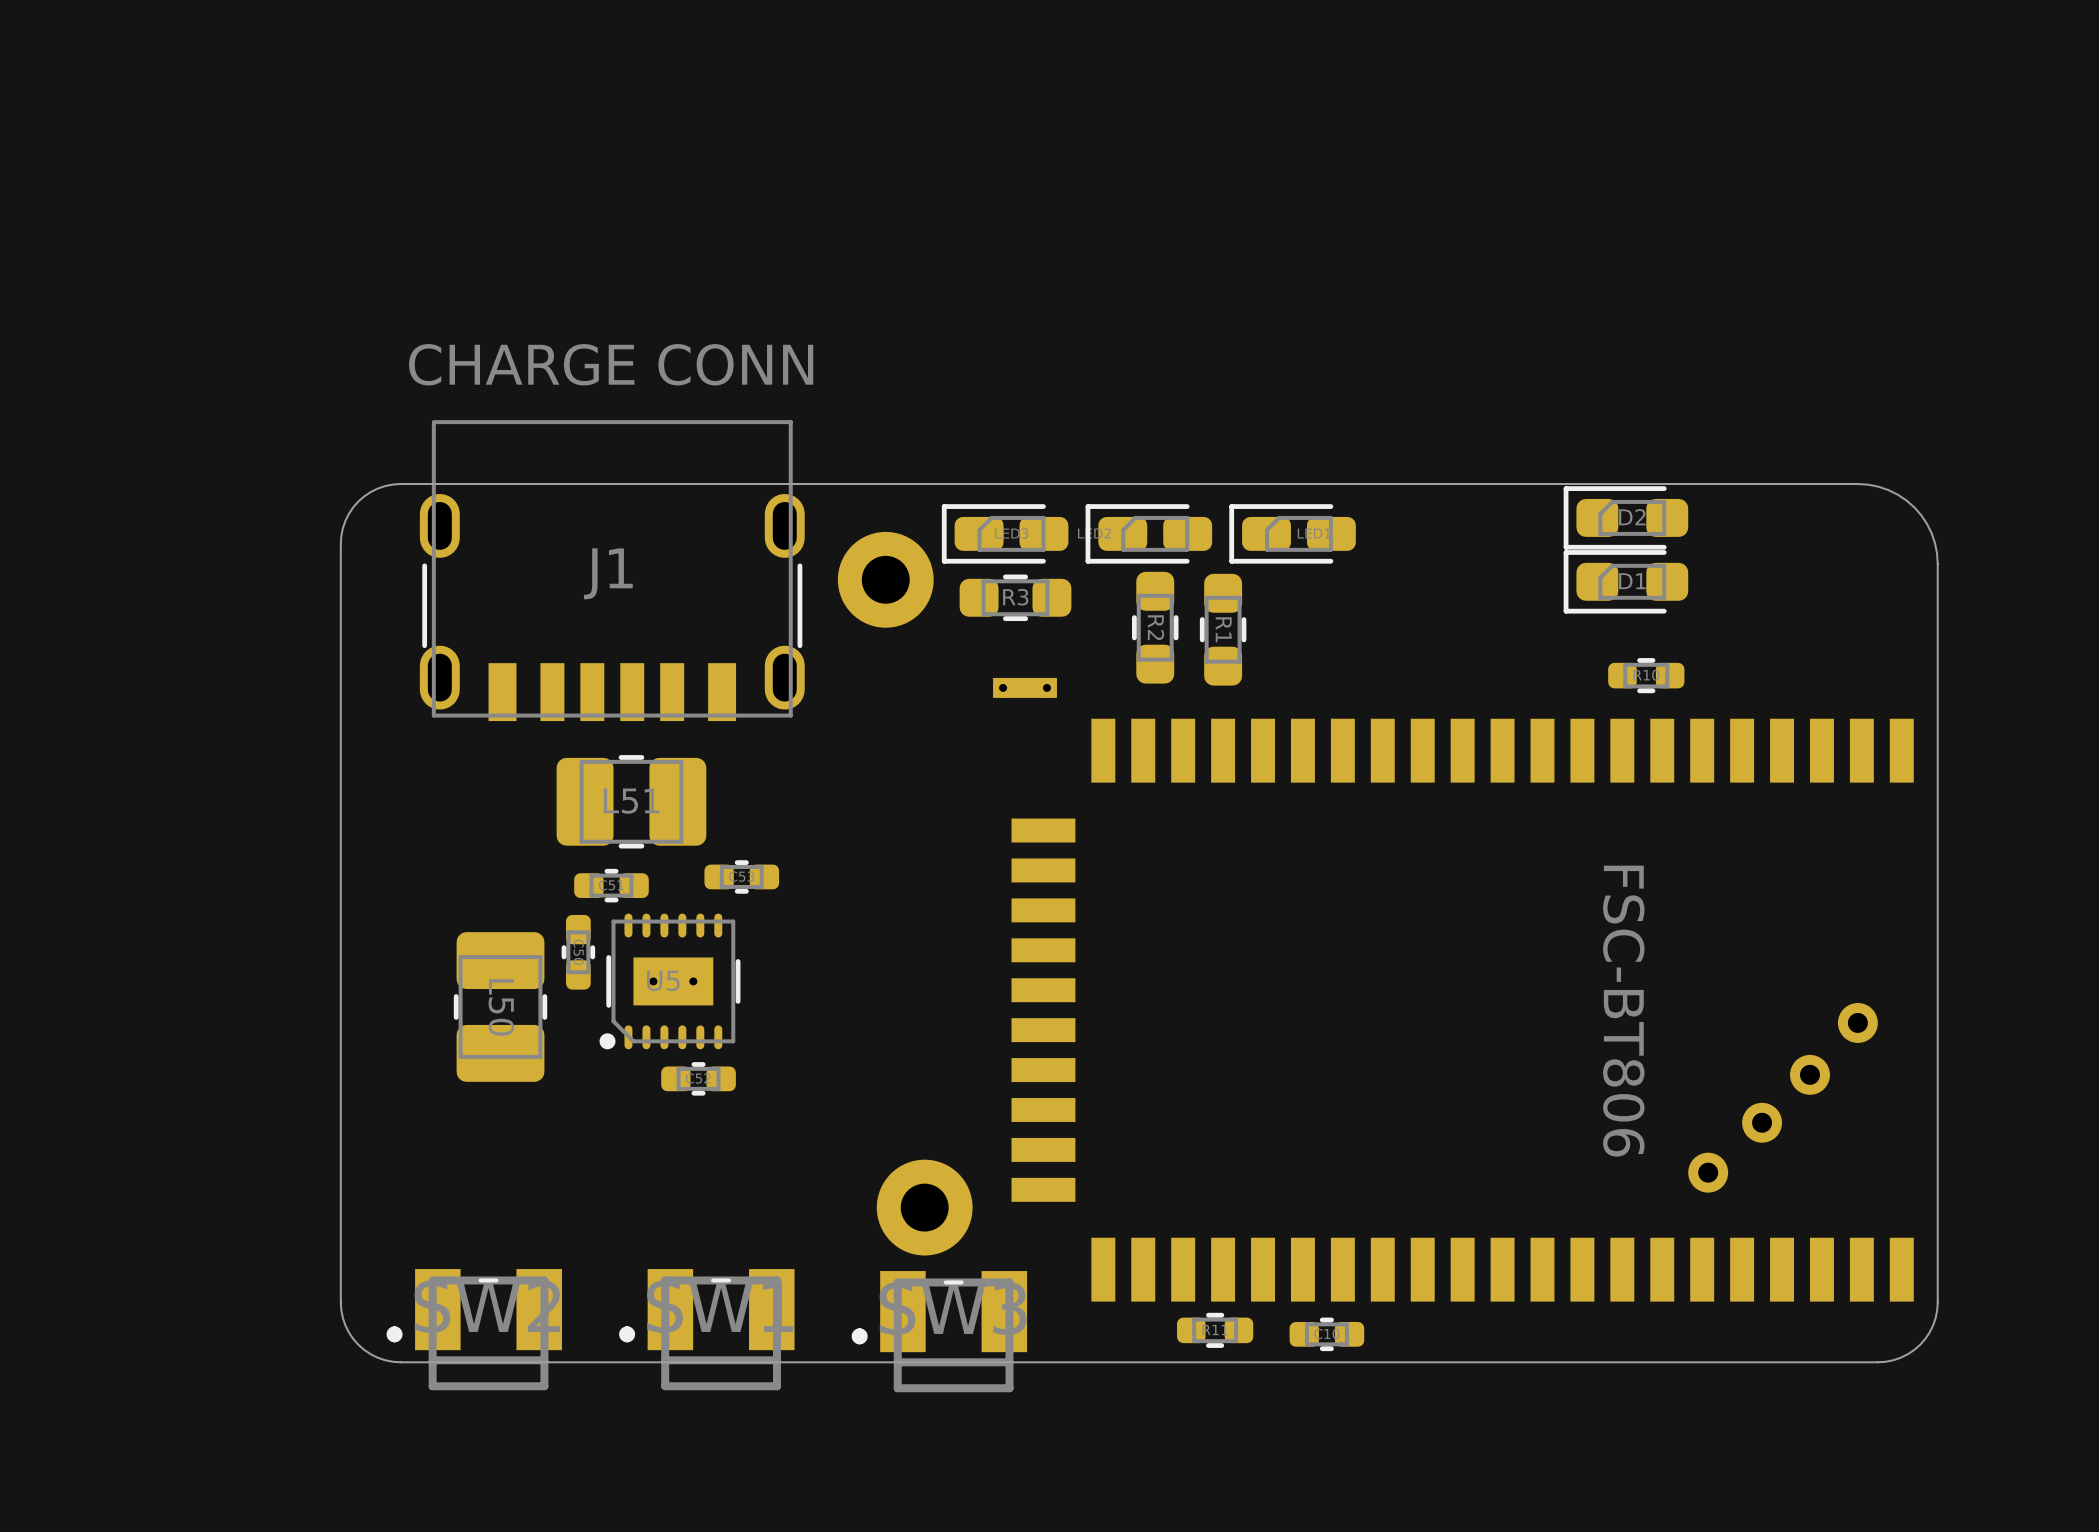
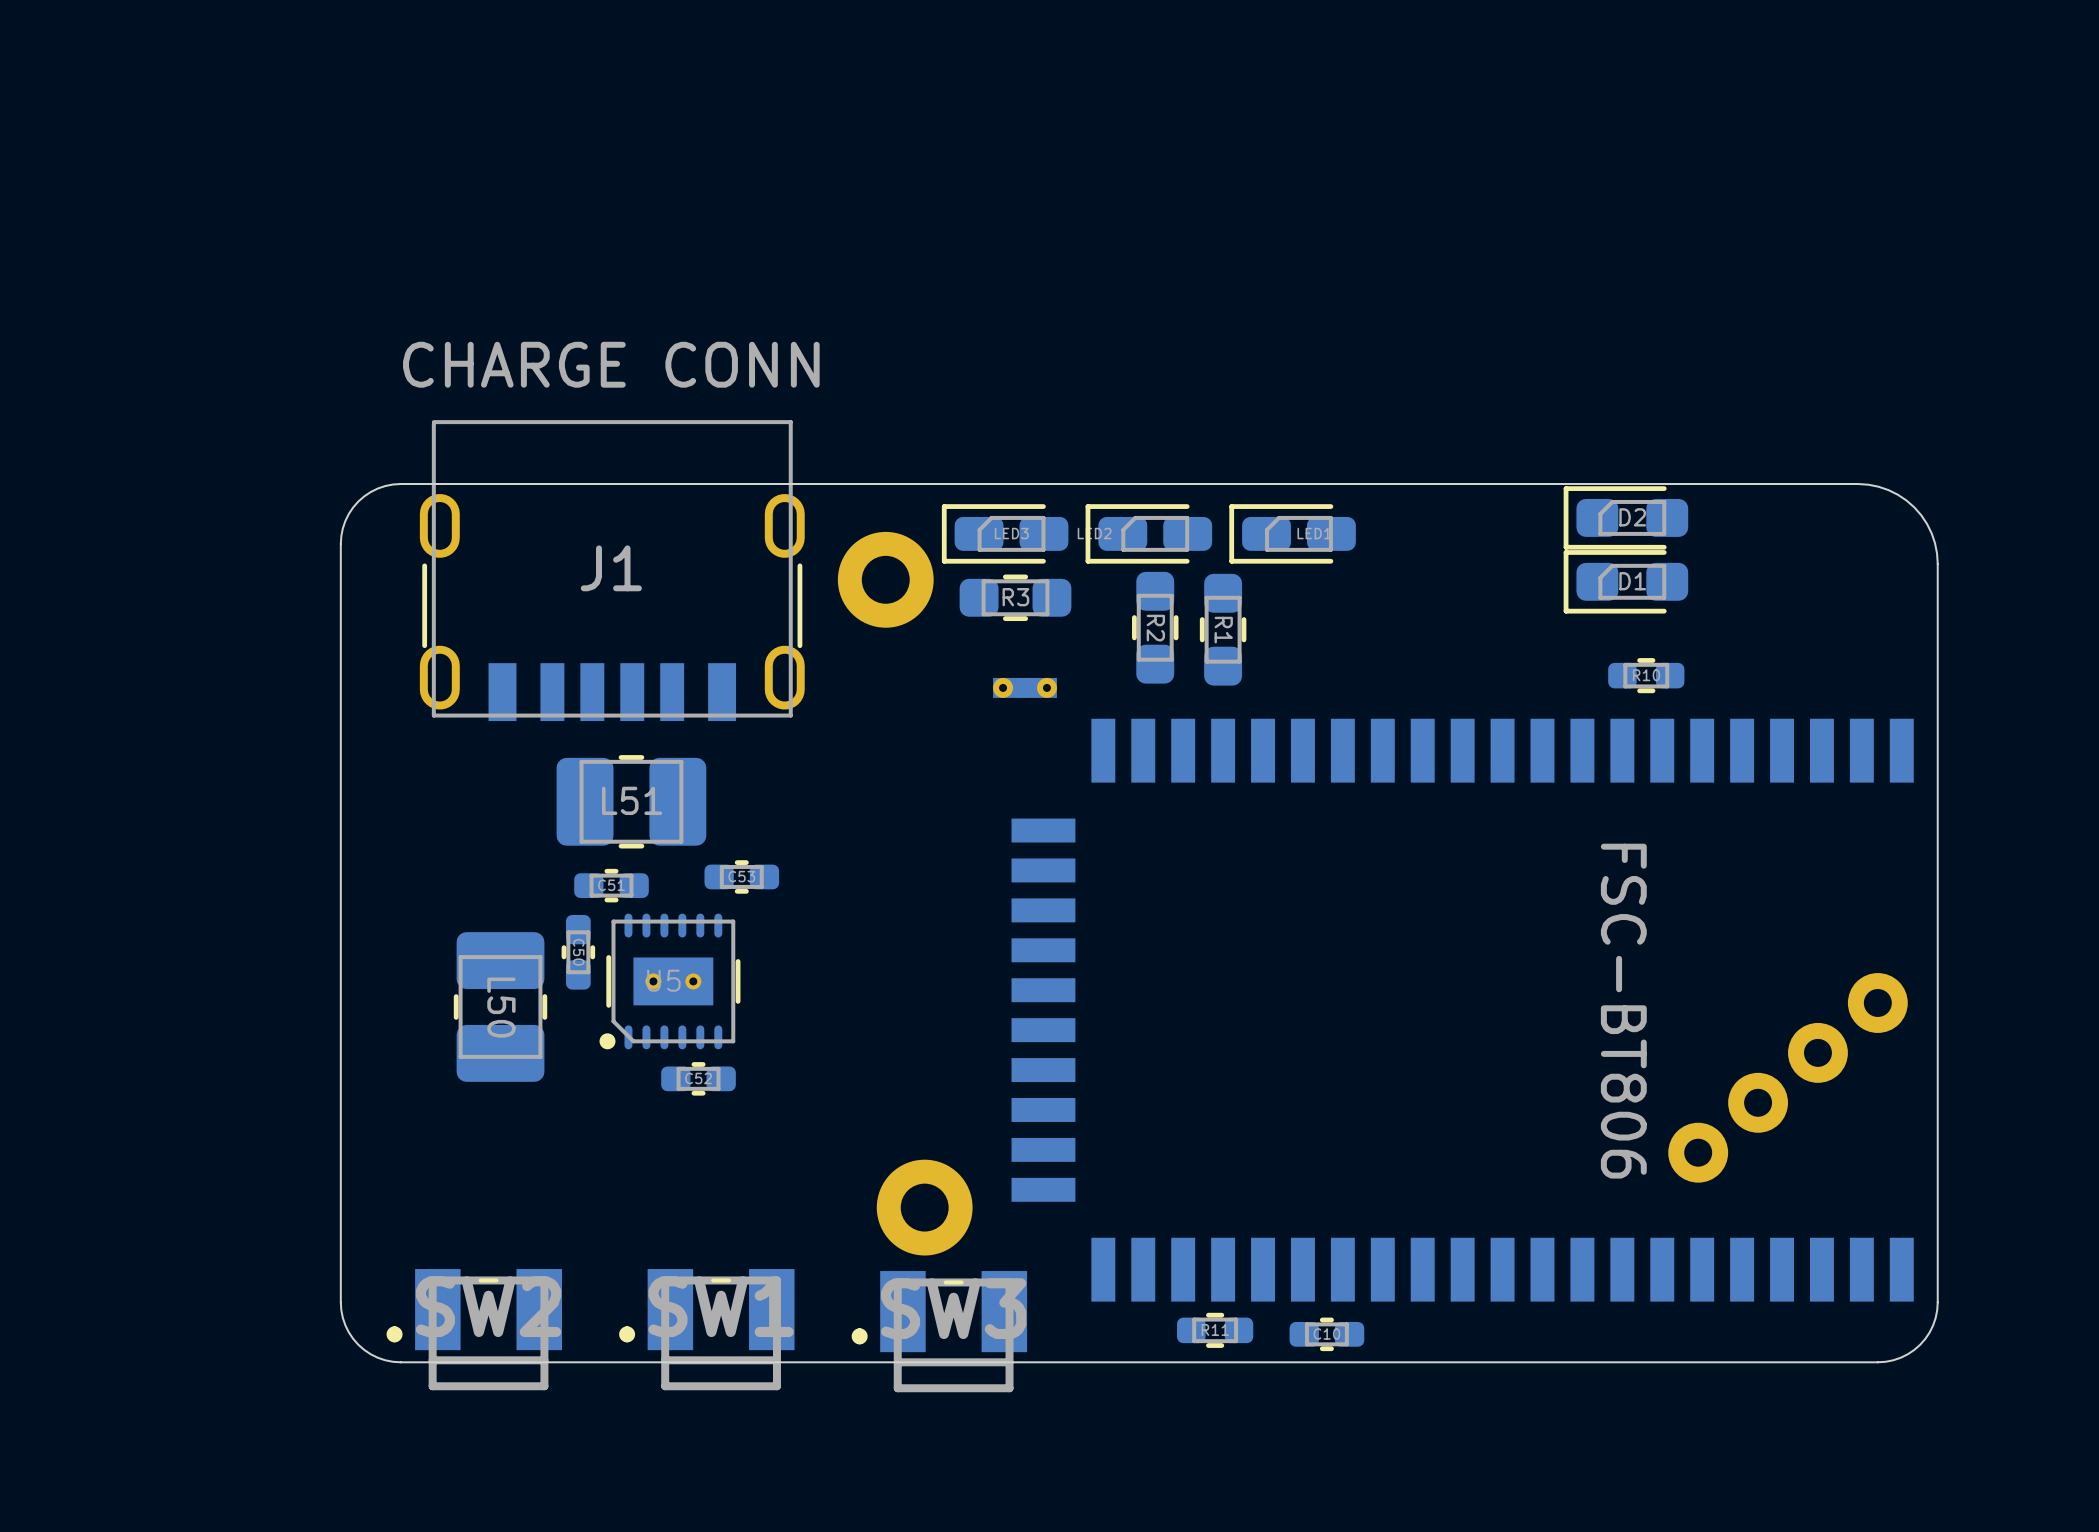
part: none -> (1877, 1002)
part: (1857, 1022) -> none
part footprint: [1790, 1054, 1830, 1095] -> [1788, 1022, 1848, 1083]
part footprint: [1742, 1102, 1783, 1143] -> [1728, 1072, 1789, 1133]
part footprint: [1688, 1152, 1729, 1193] -> [1668, 1122, 1729, 1183]

